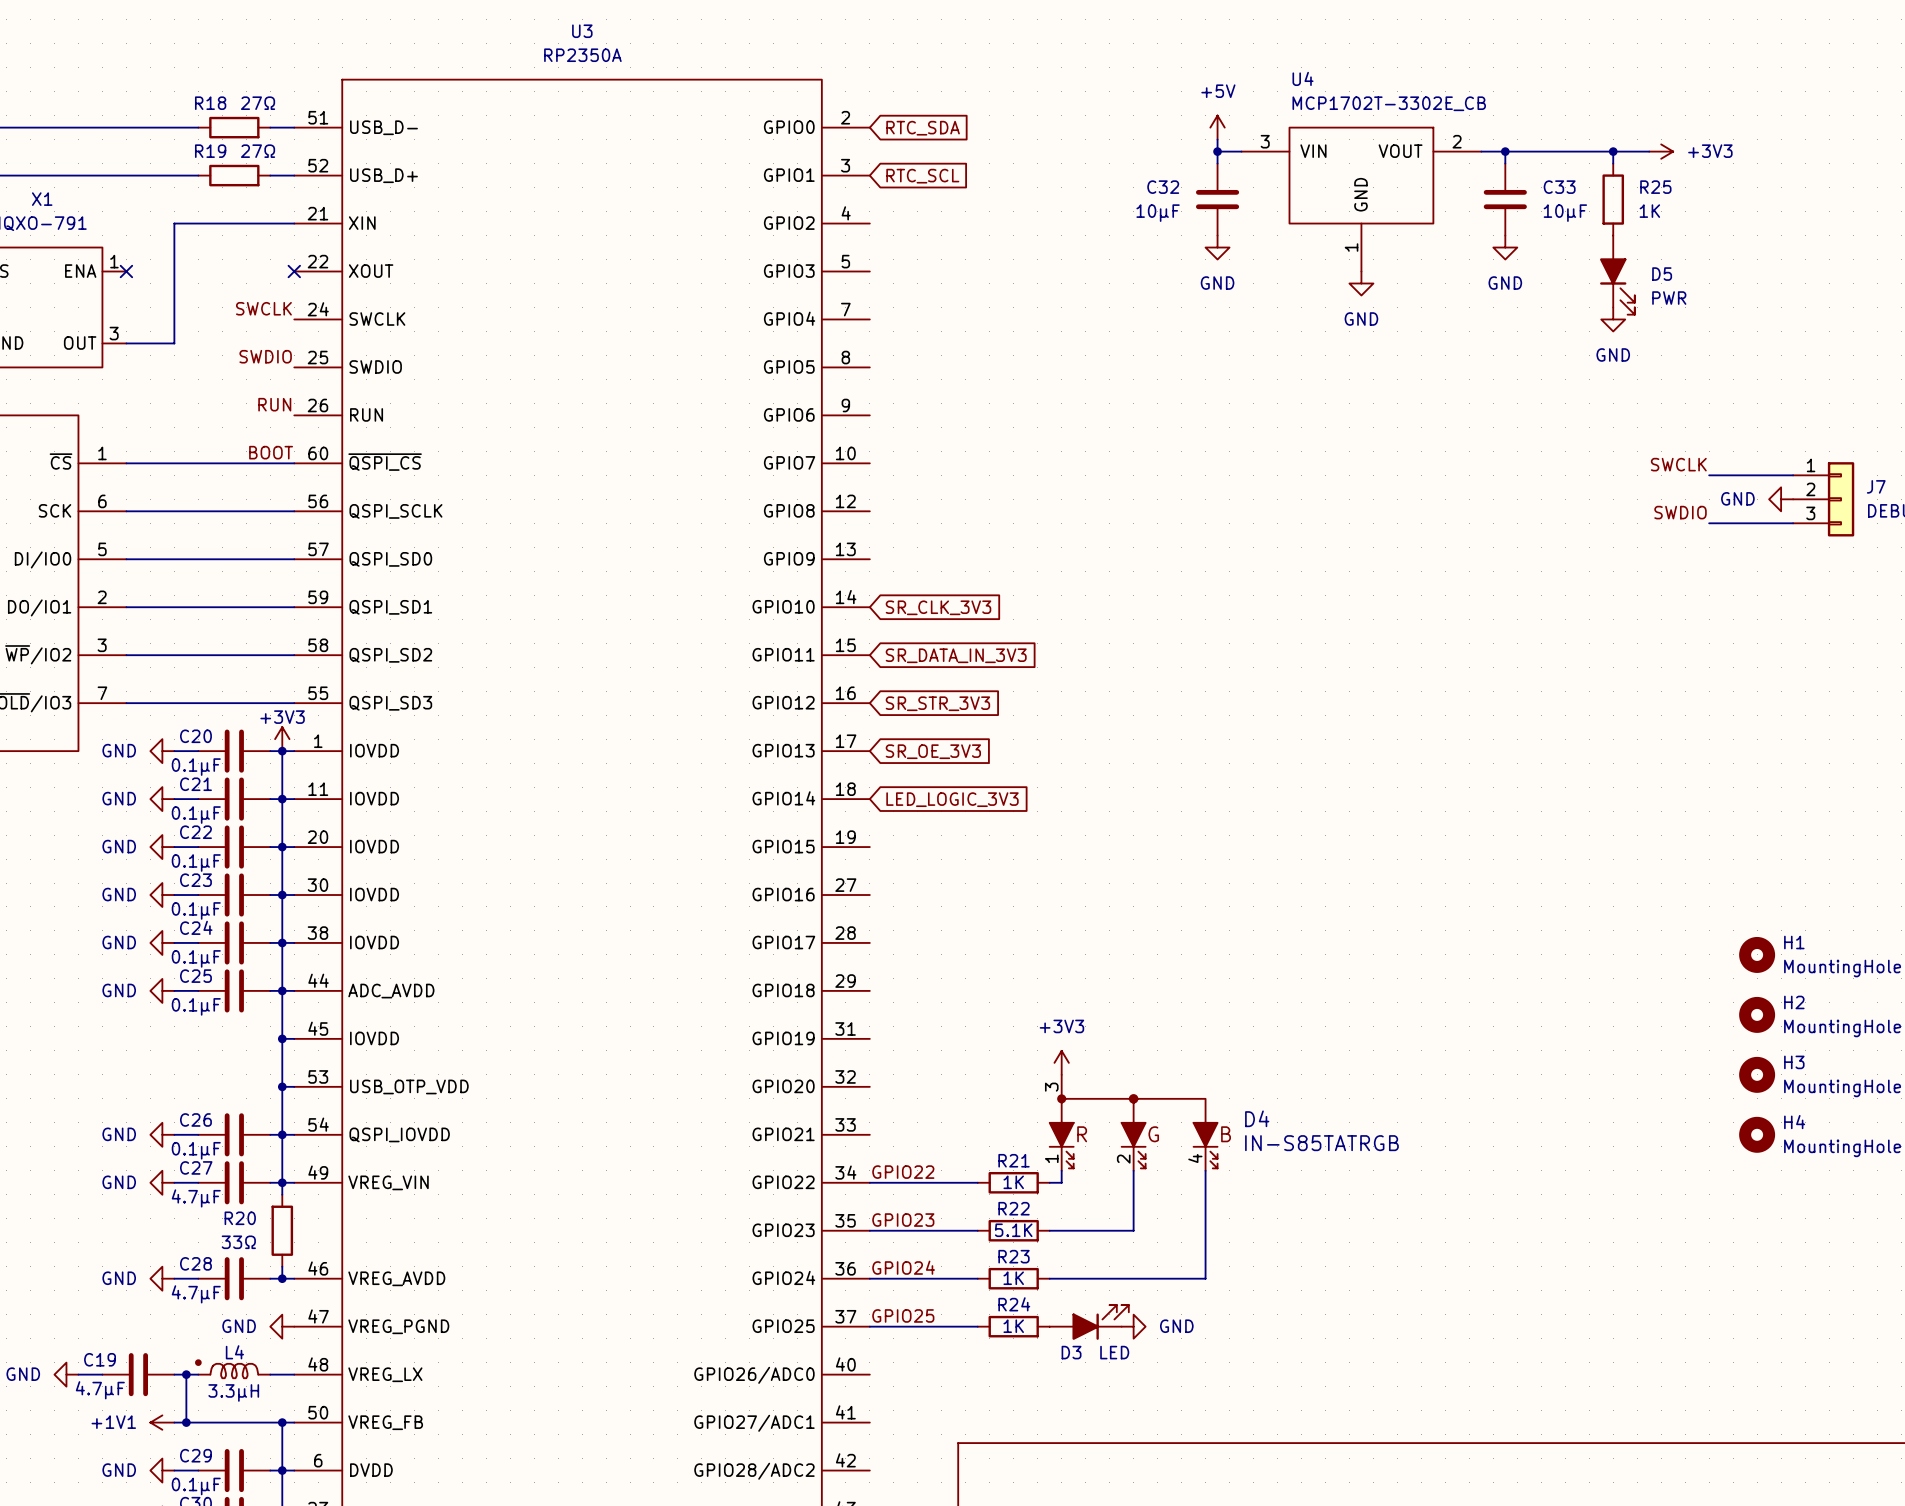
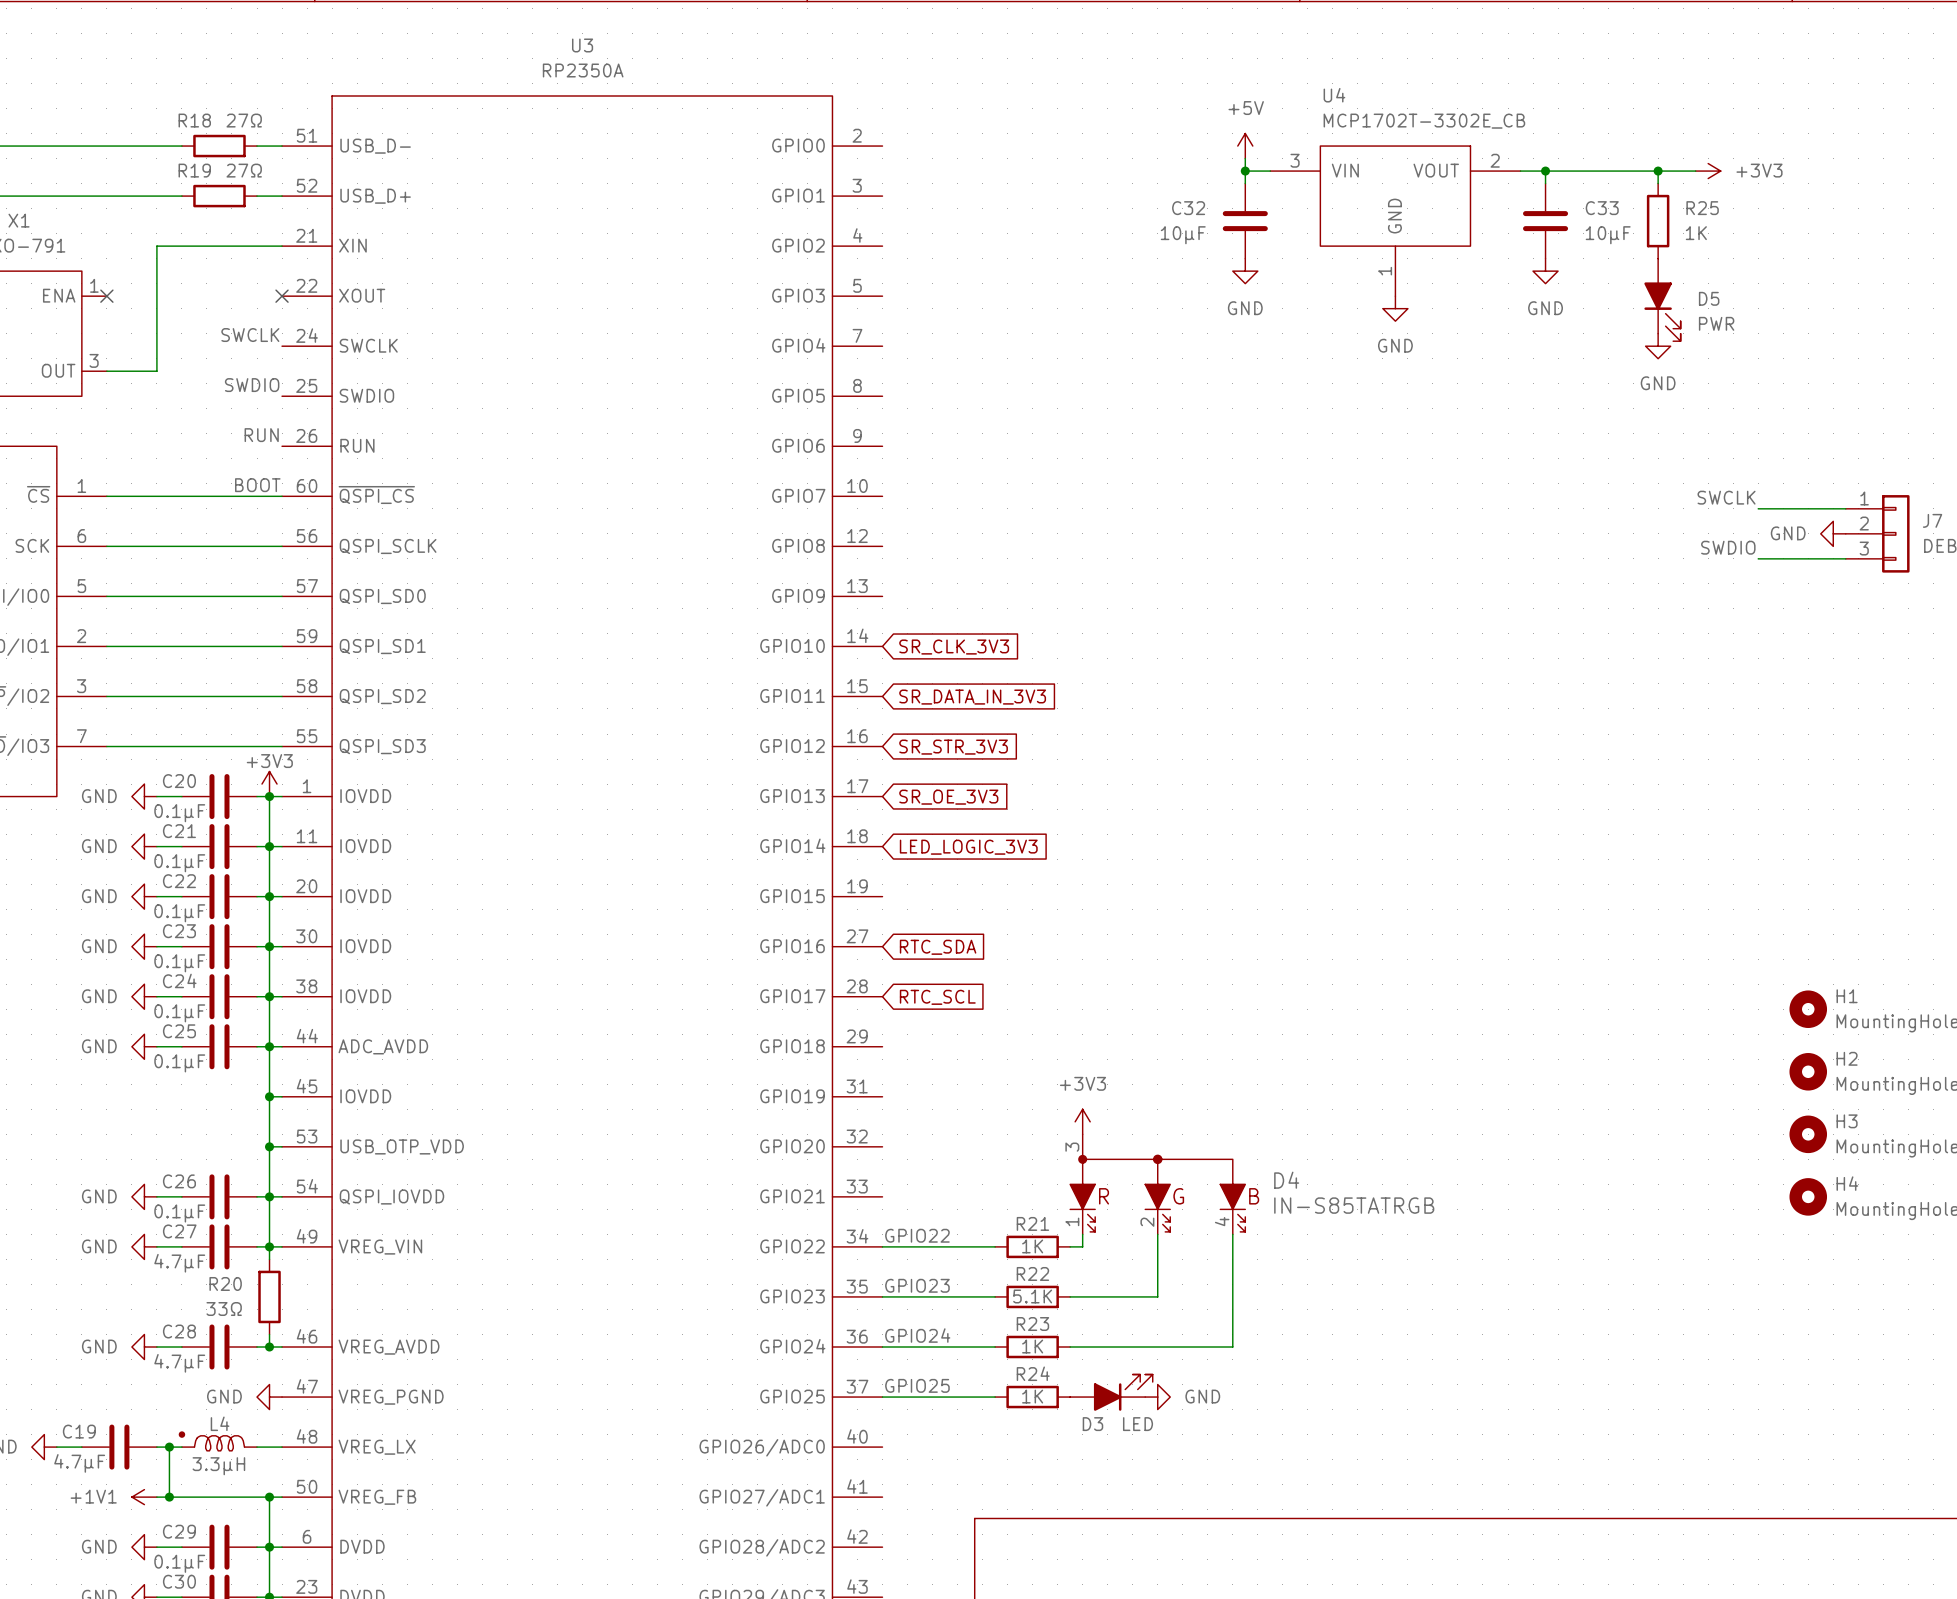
global label: RTC_SDA (923, 128) -> none
global label: RTC_SCL (922, 176) -> none
global label: none -> RTC_SDA (938, 947)
global label: none -> RTC_SCL (937, 997)

